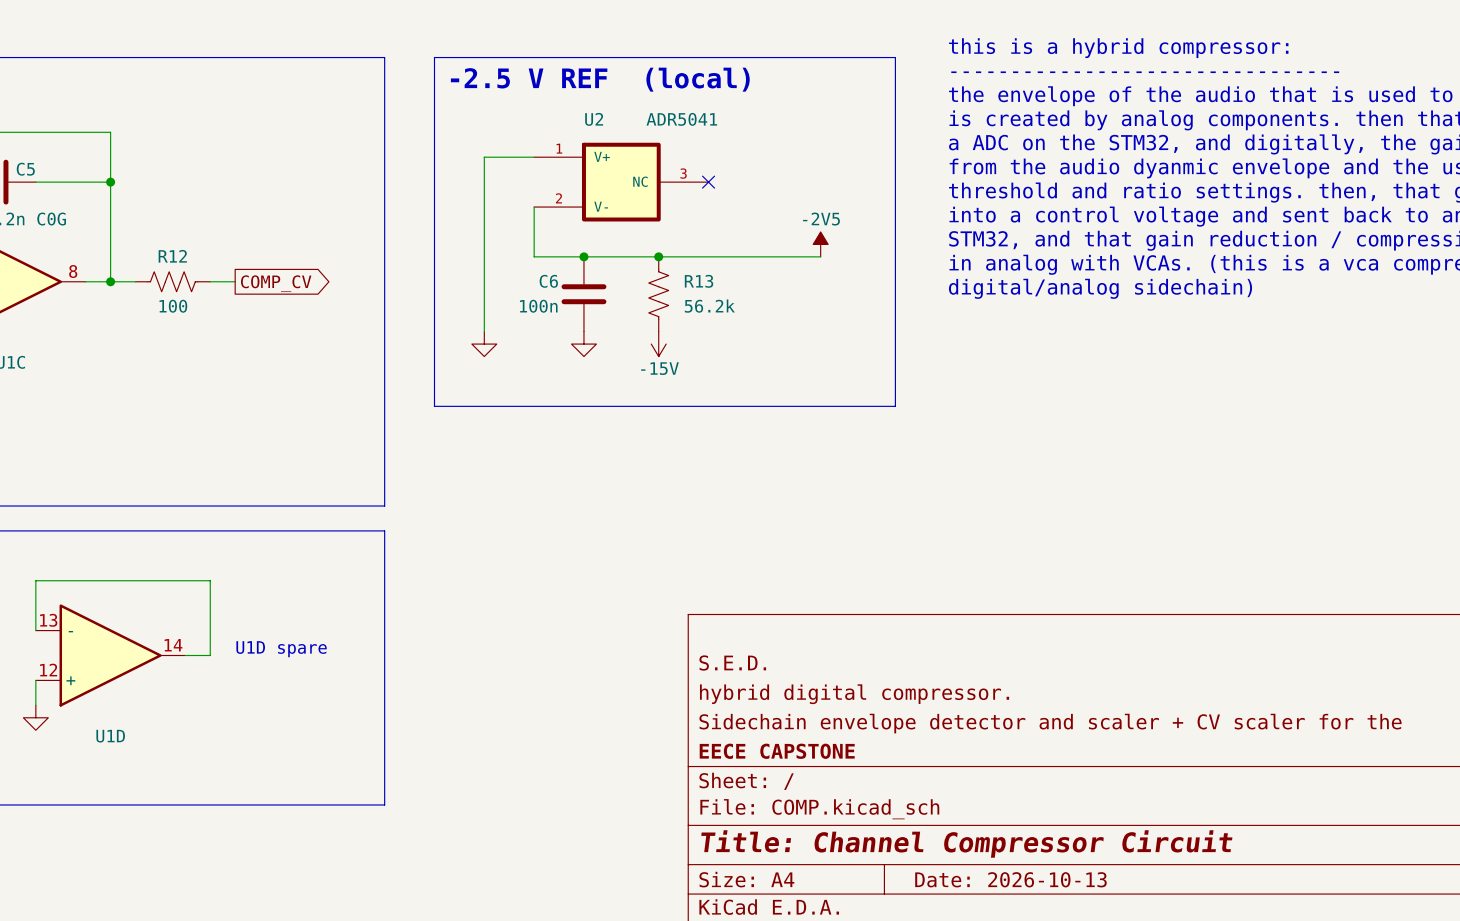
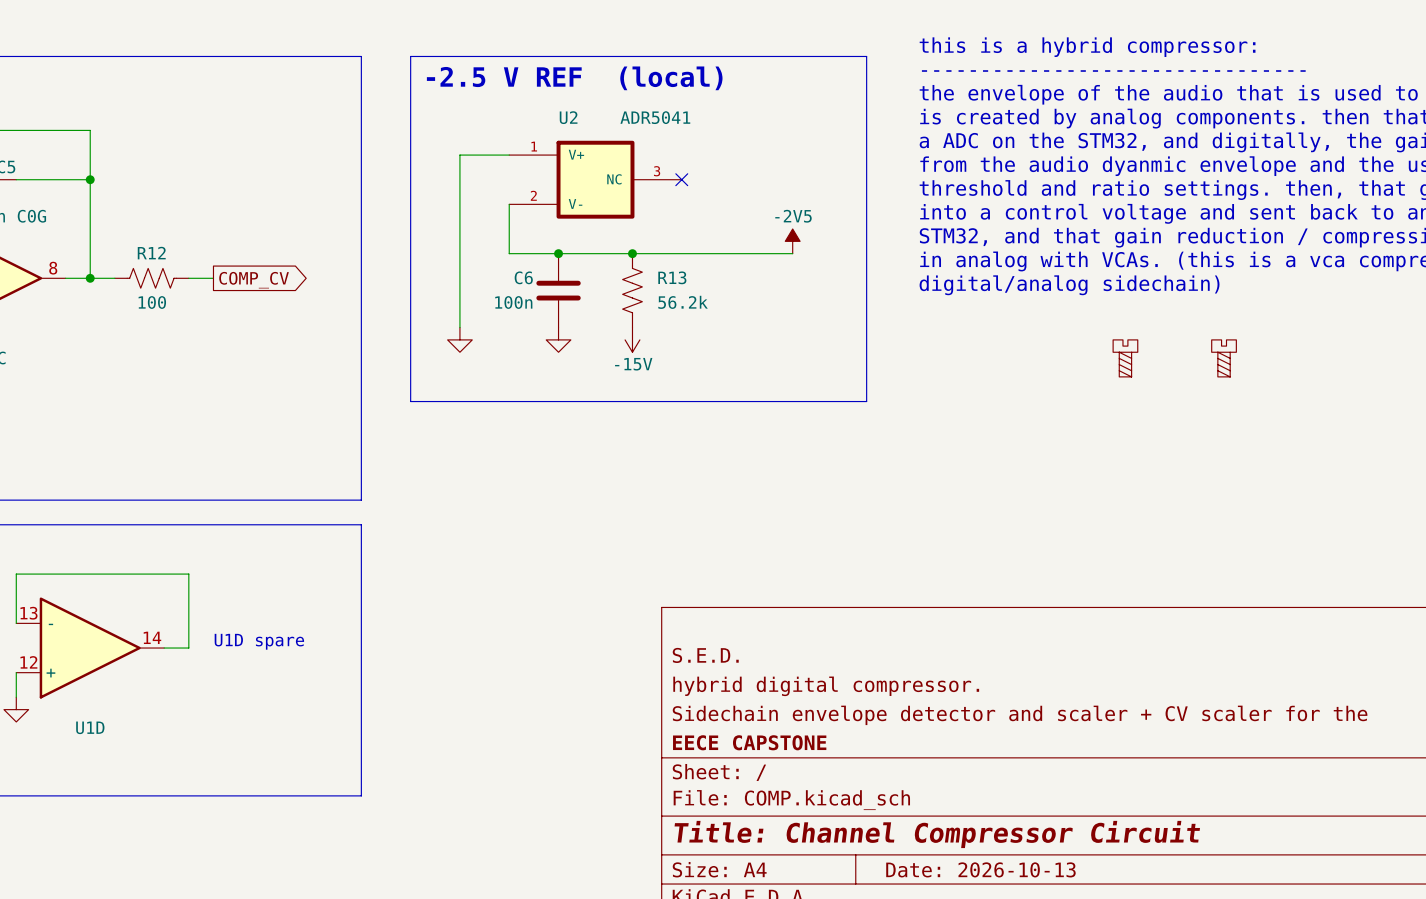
part: none -> (1125, 358)
part: none -> (1224, 358)

